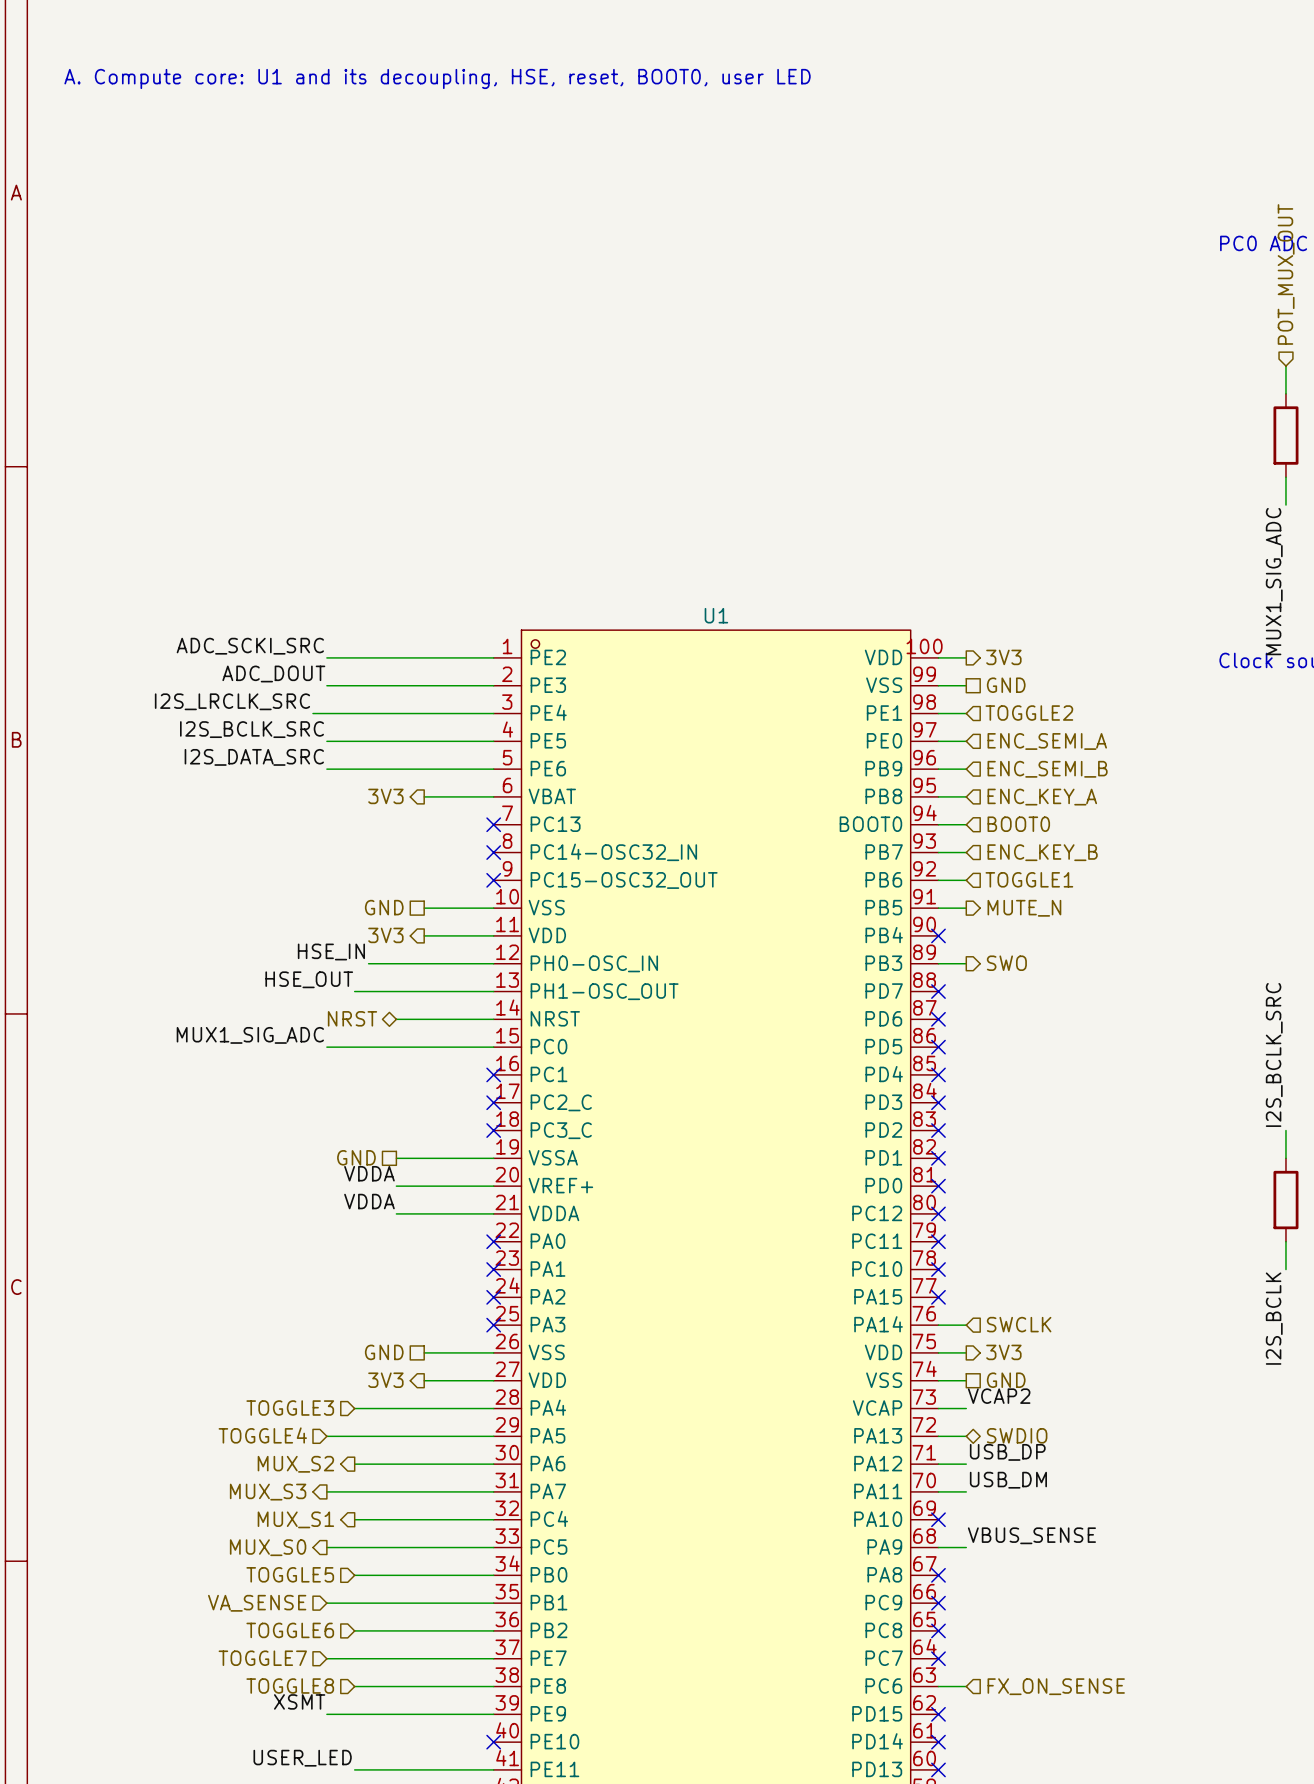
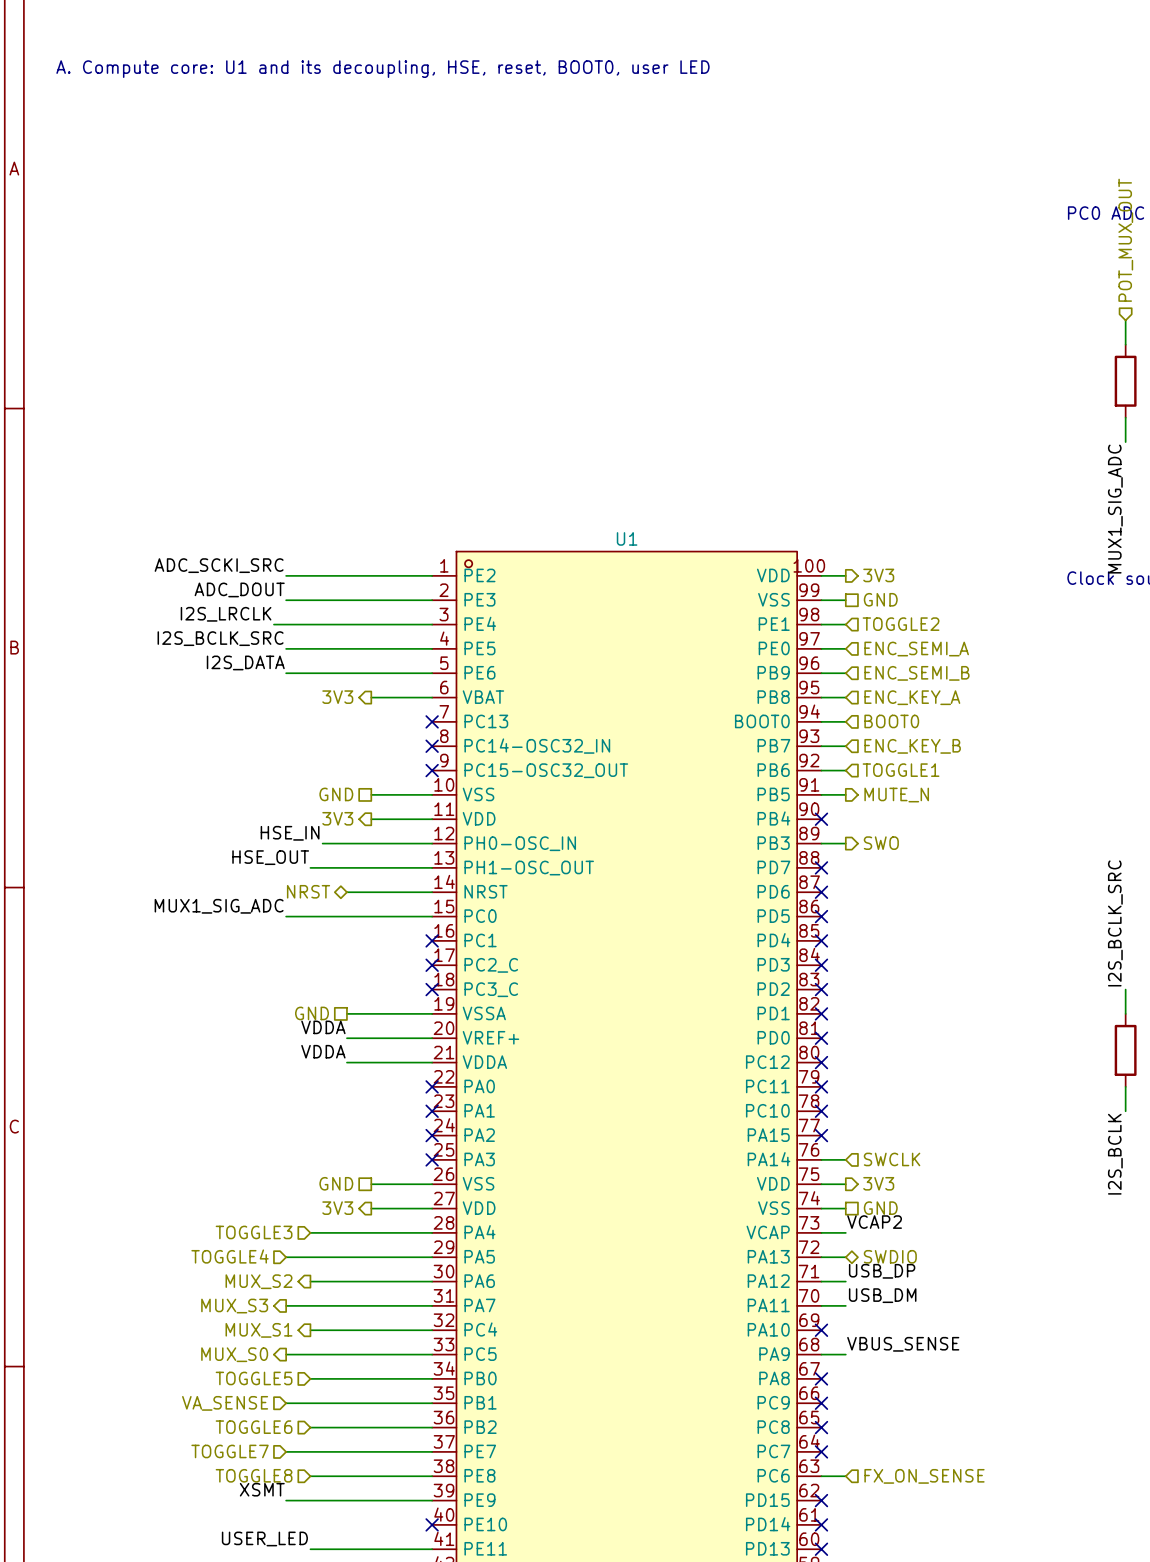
label: I2S_LRCLK_SRC (232, 701) -> I2S_LRCLK (226, 614)
label: I2S_DATA_SRC (254, 757) -> I2S_DATA (245, 662)

